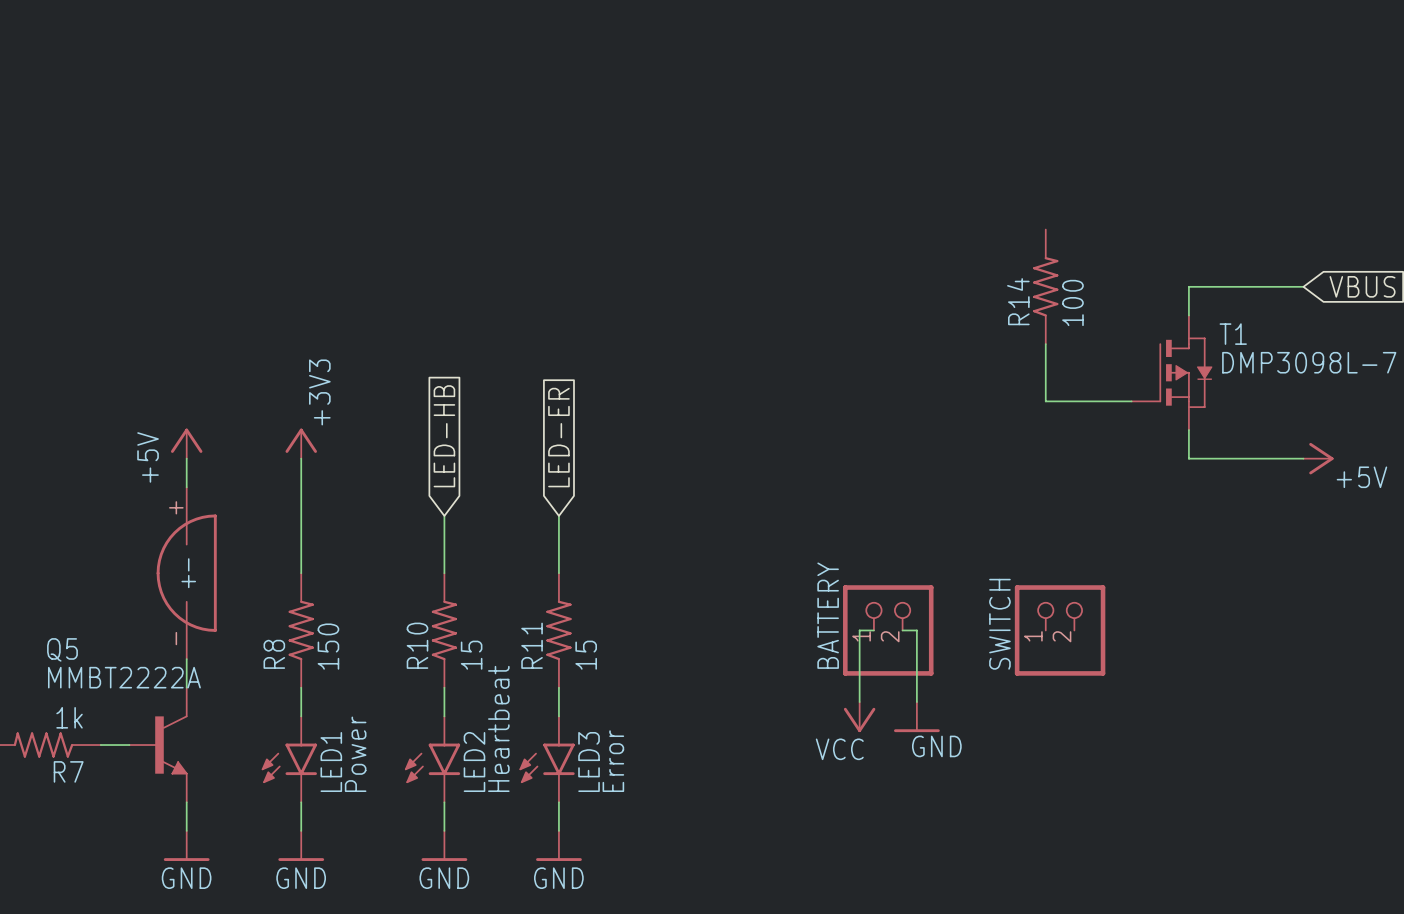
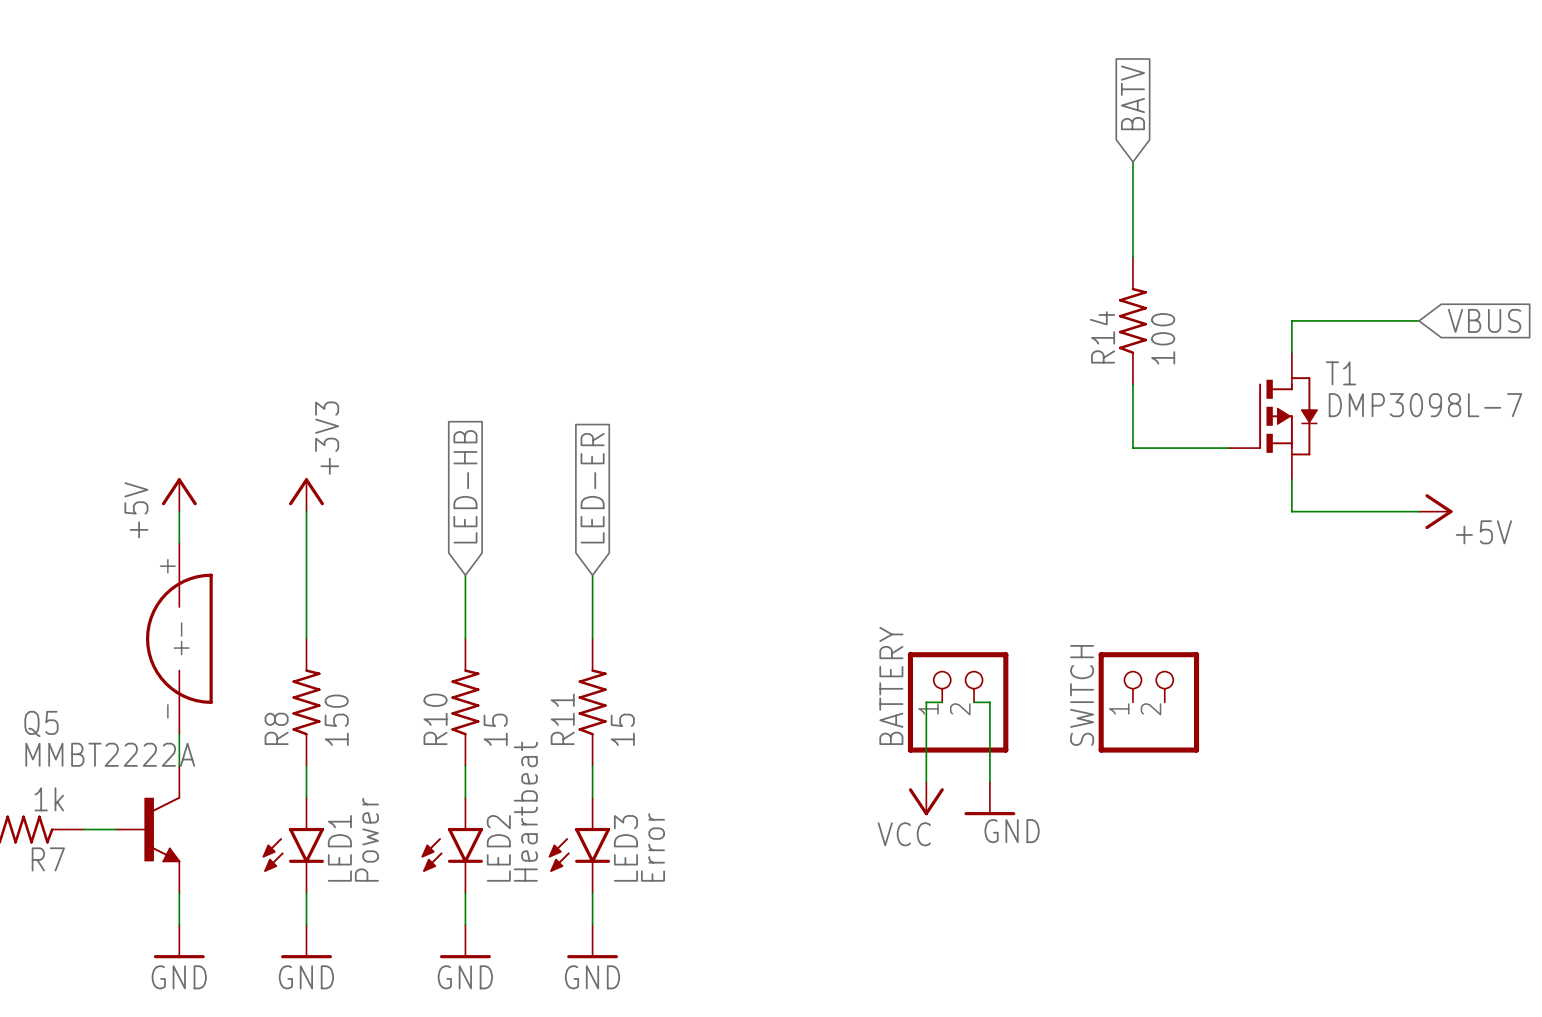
global label: none -> BATV (1132, 97)
wire: none -> (1132, 161) (1132, 257)

